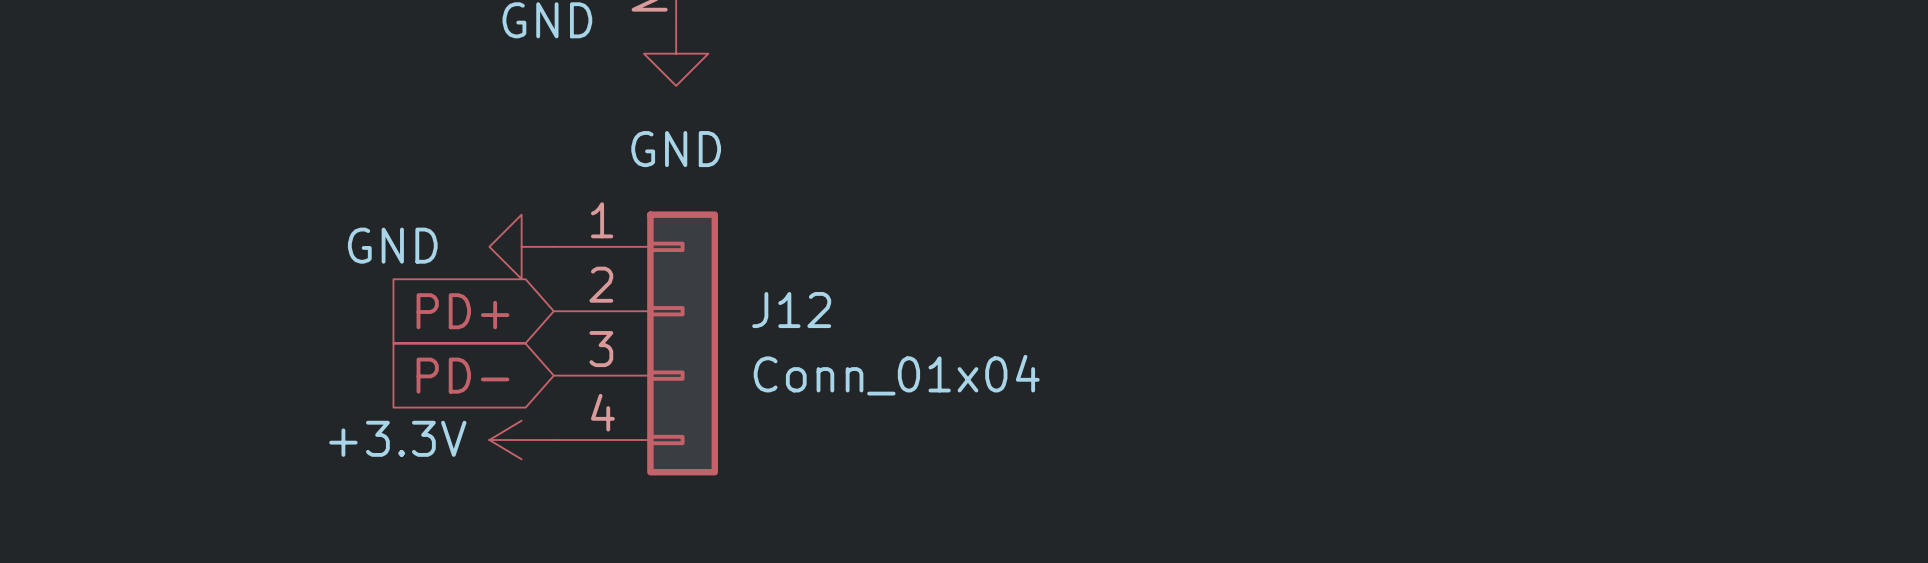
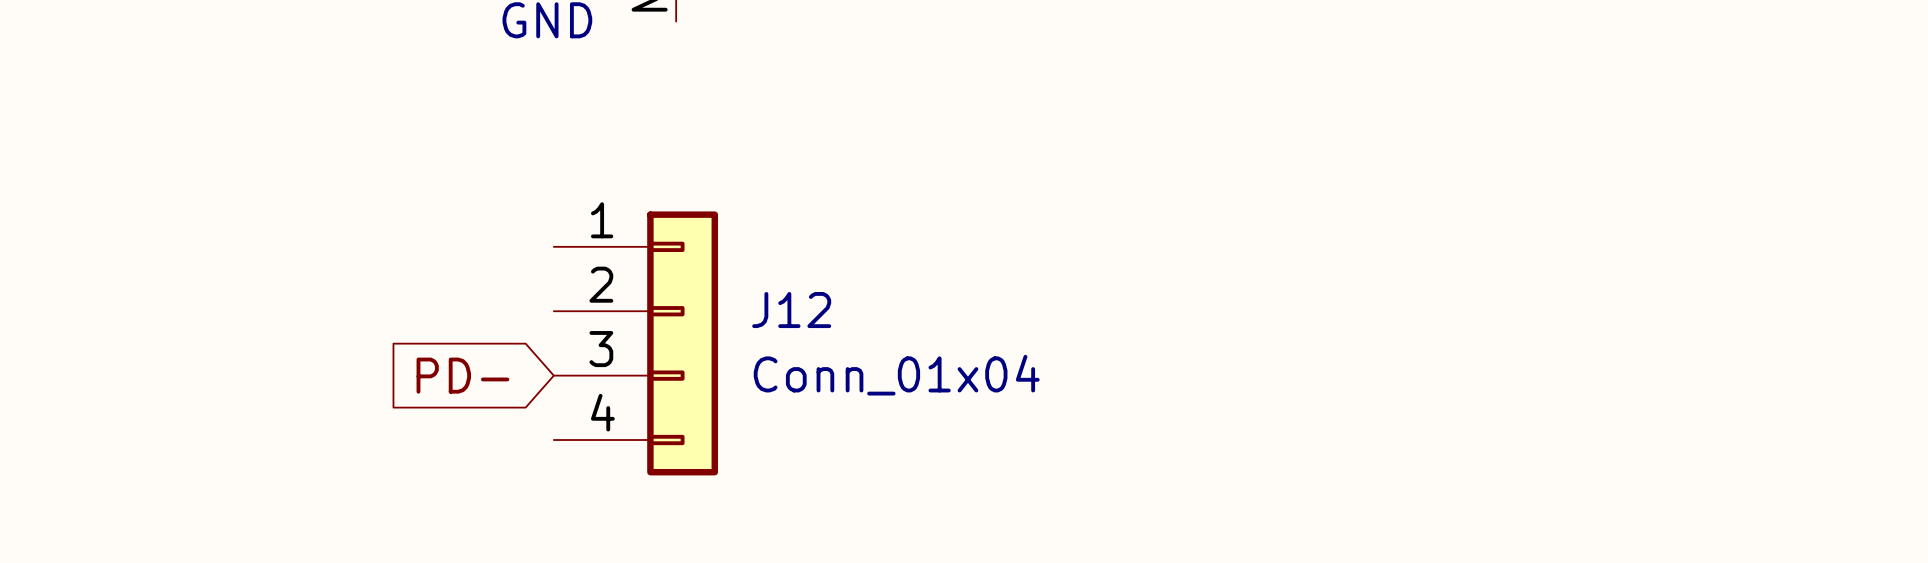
power symbol: GND (676, 53) -> none
power symbol: GND (521, 246) -> none
global label: PD+ (462, 311) -> none
power symbol: +3.3V (521, 440) -> none

